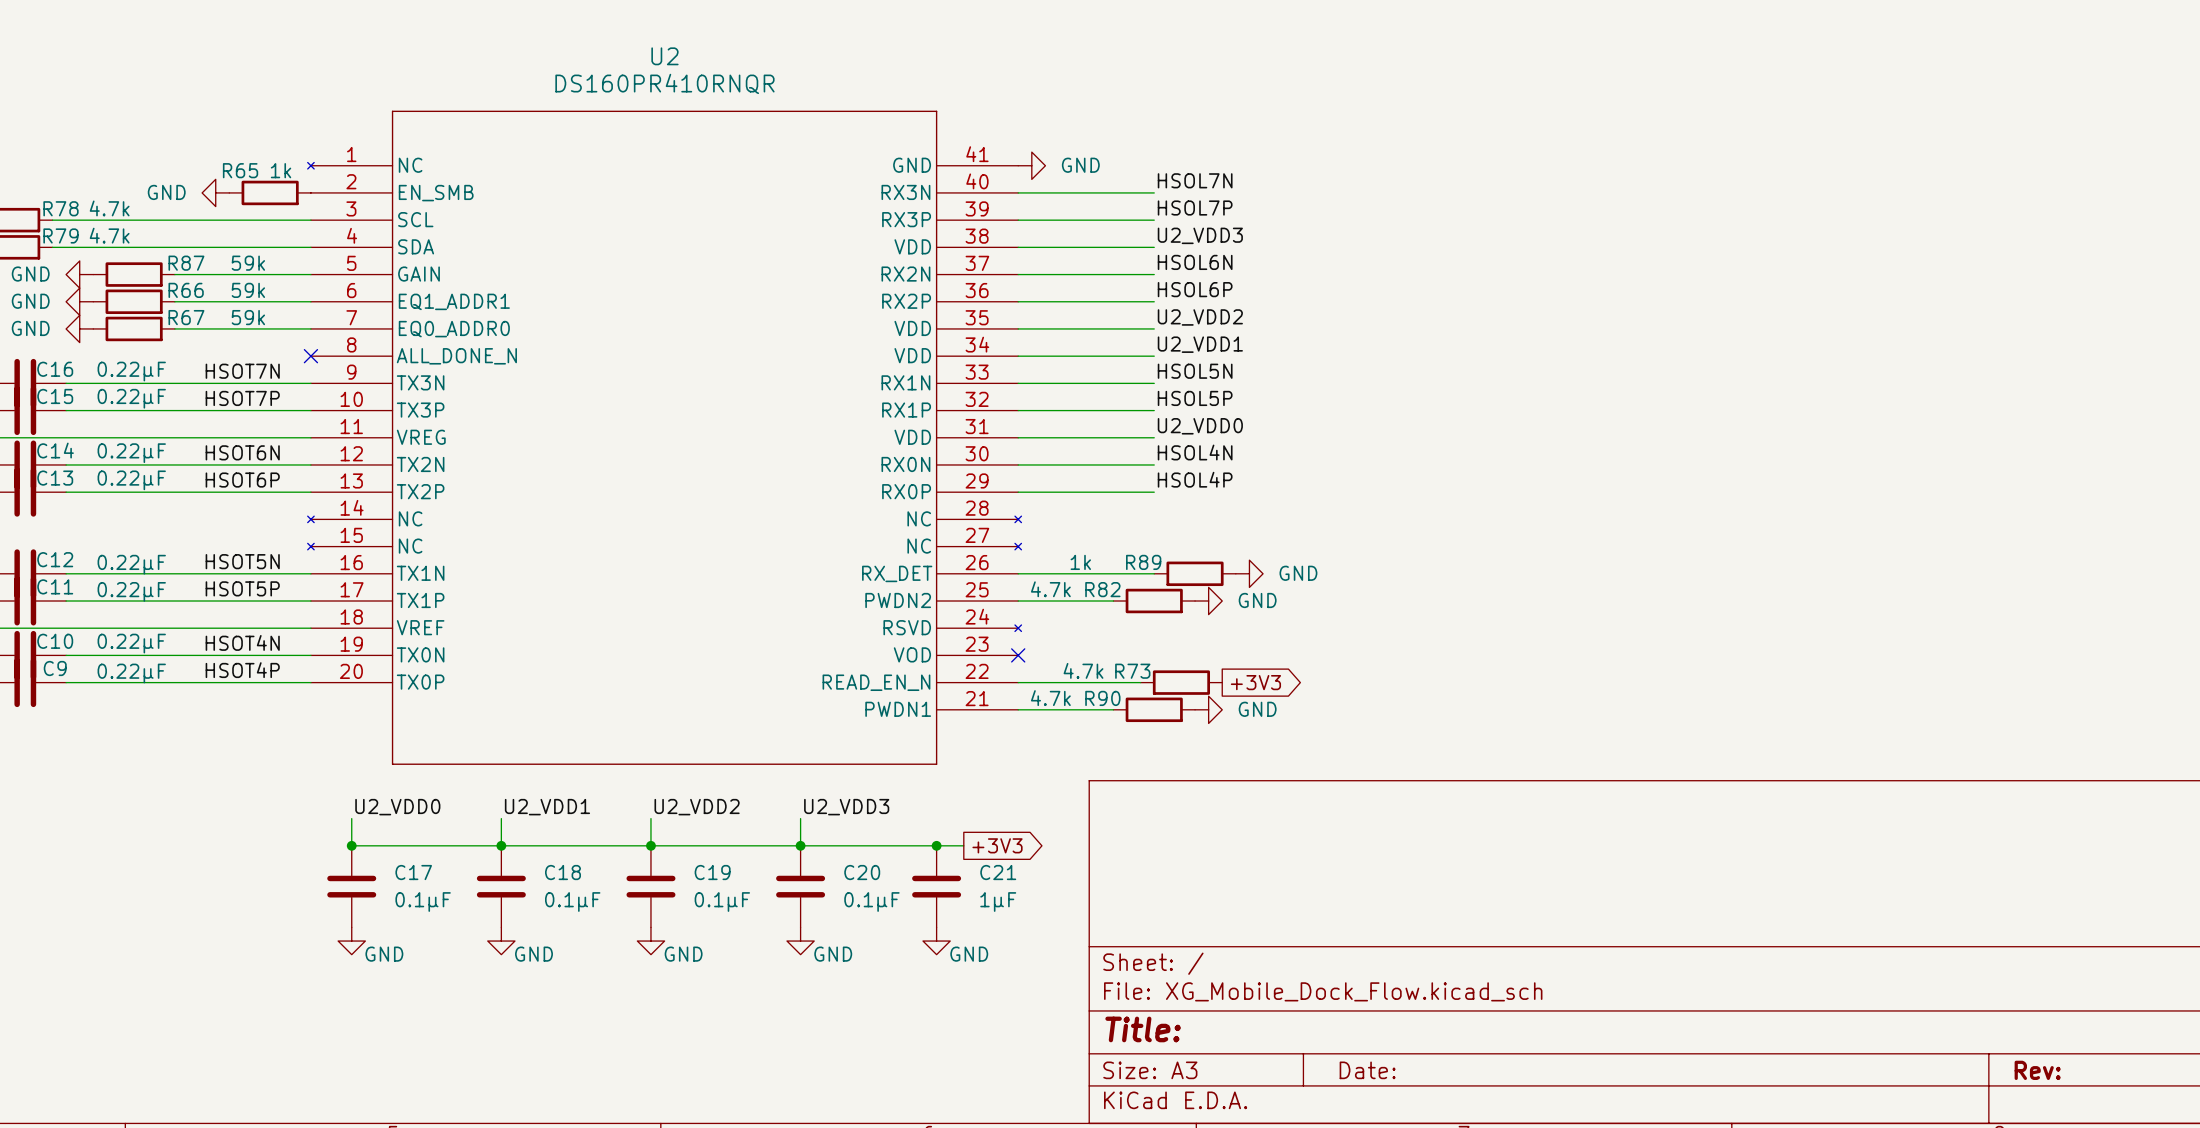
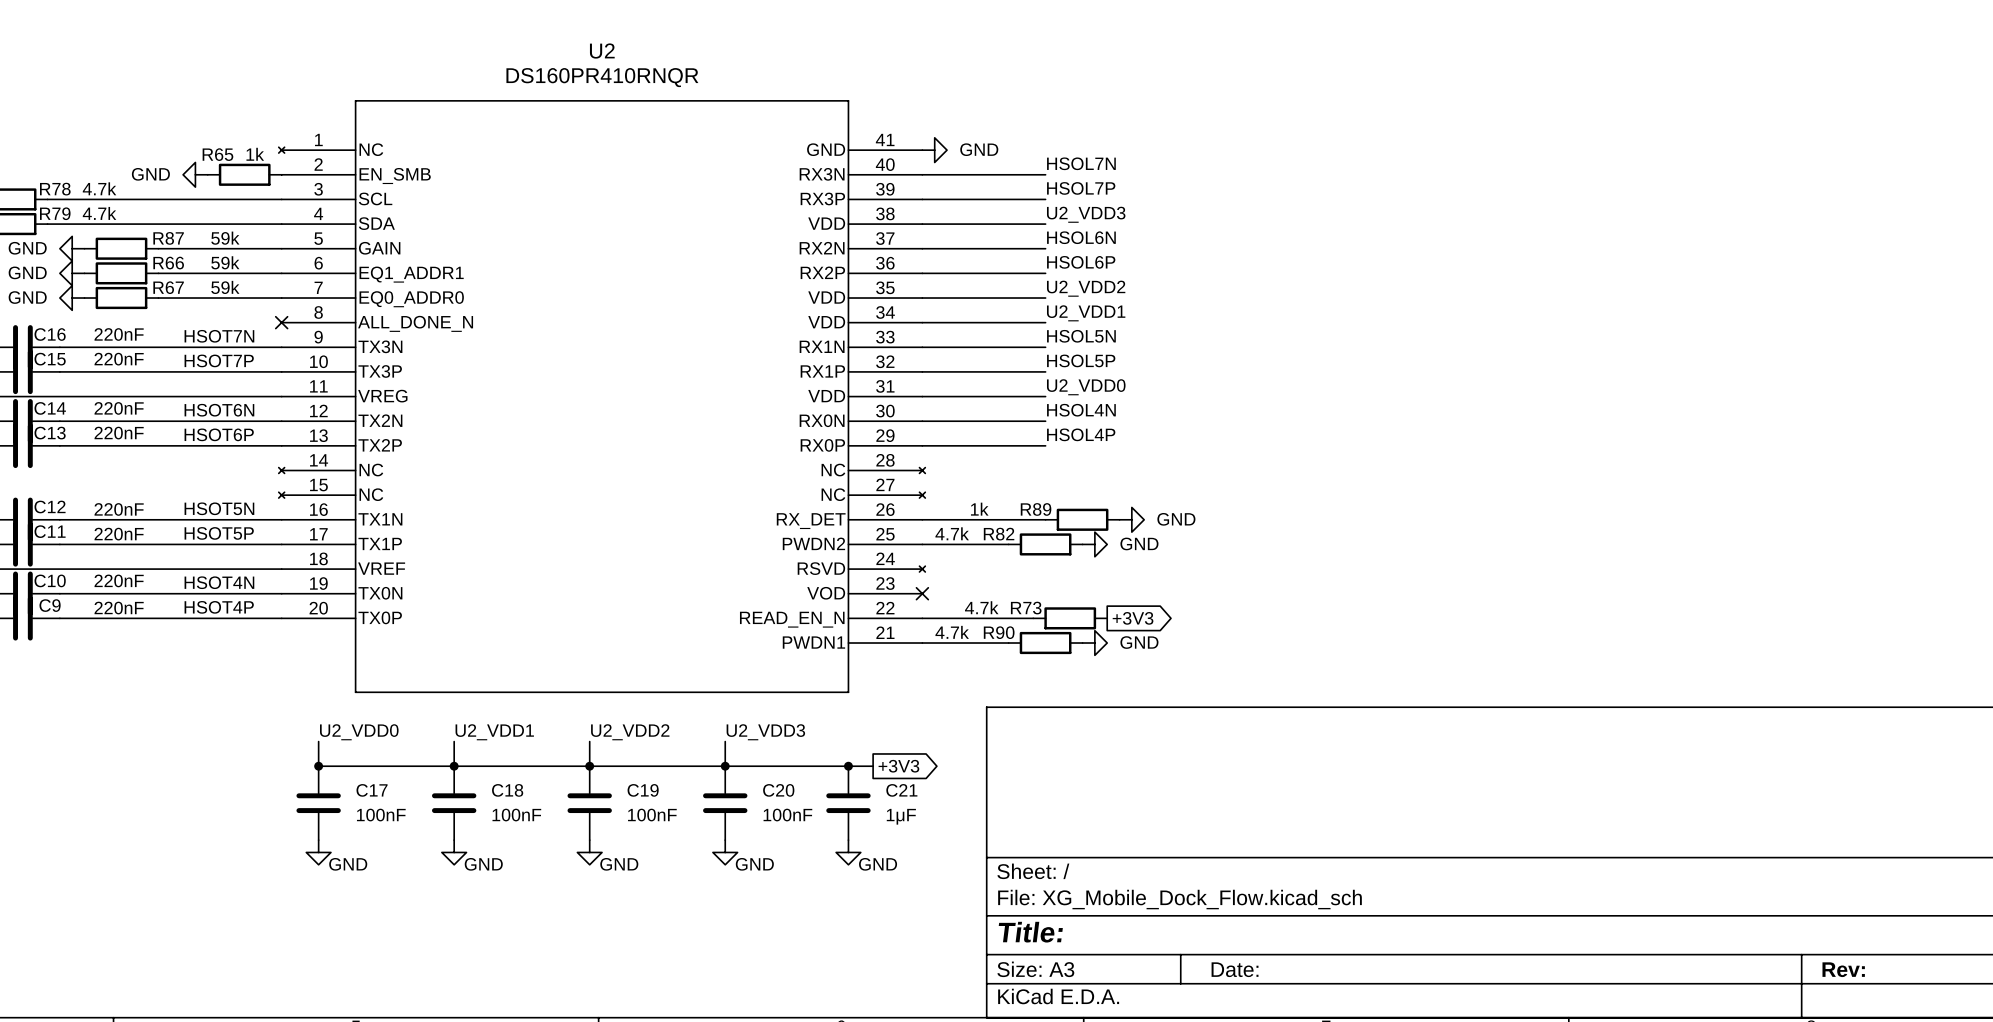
C16 value: 0.22μF (131, 371) -> 220nF (119, 334)
C15 value: 0.22μF (131, 398) -> 220nF (119, 359)
C14 value: 0.22μF (131, 453) -> 220nF (119, 408)
C13 value: 0.22μF (131, 480) -> 220nF (119, 433)
C12 value: 0.22μF (131, 564) -> 220nF (119, 509)
C11 value: 0.22μF (131, 591) -> 220nF (119, 534)
C10 value: 0.22μF (131, 643) -> 220nF (119, 580)
C9 value: 0.22μF (131, 673) -> 220nF (119, 608)
C17 value: 0.1μF (423, 901) -> 100nF (381, 815)
C18 value: 0.1μF (572, 901) -> 100nF (516, 815)
C19 value: 0.1μF (722, 901) -> 100nF (652, 815)
C20 value: 0.1μF (871, 901) -> 100nF (787, 815)

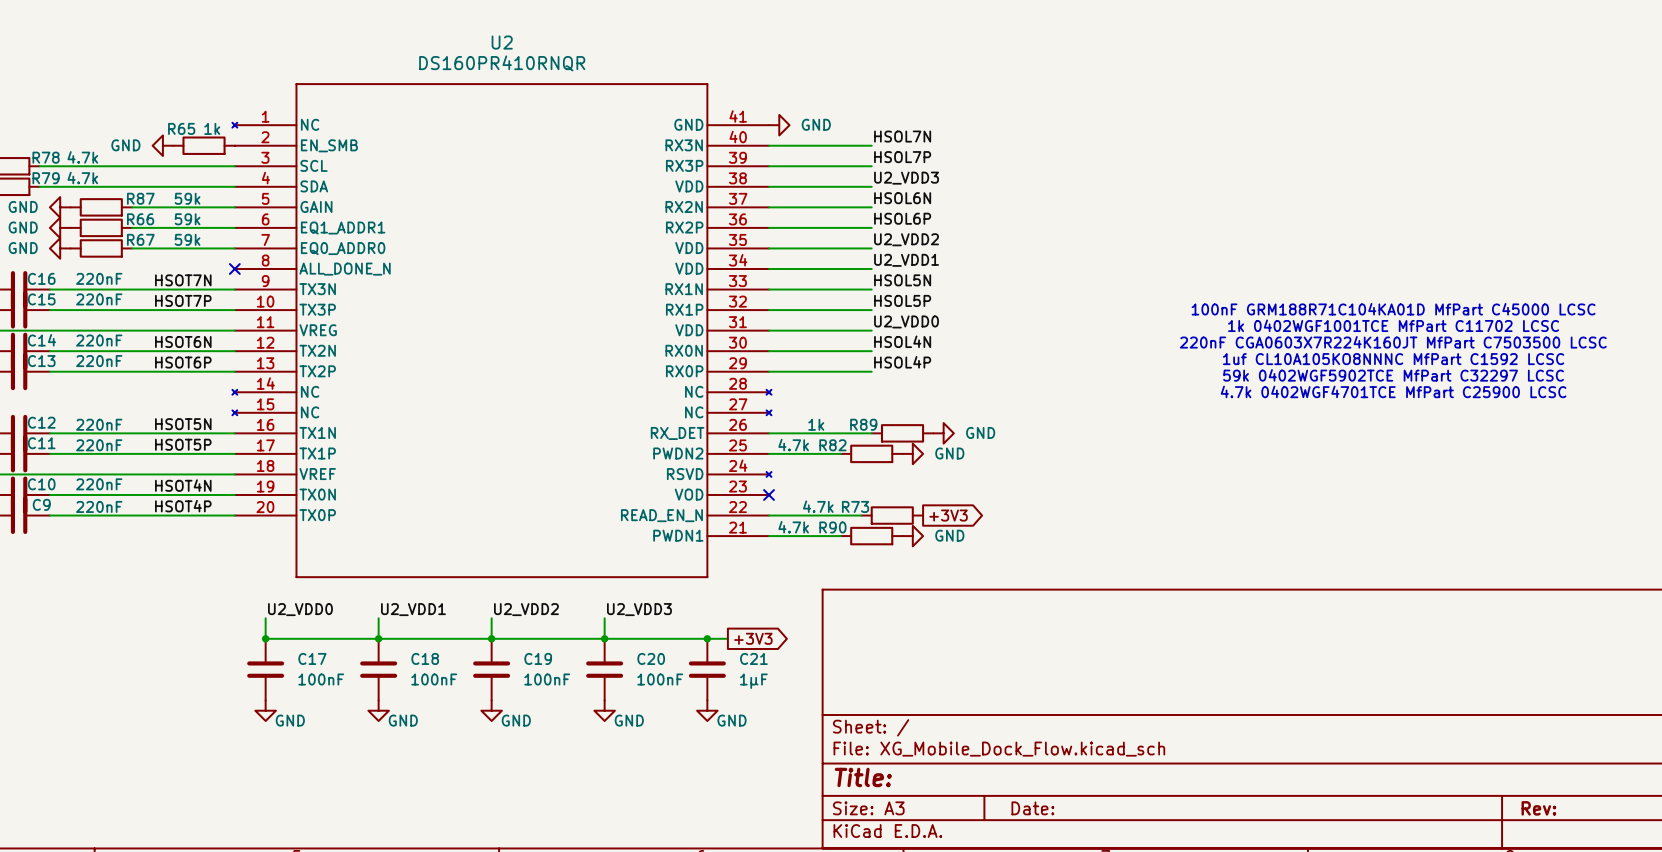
text: none -> 100nF GRM188R71C104KA01D MfPart C45000 LCSC (1393, 309)
text: none -> 1k 0402WGF1001TCE MfPart C11702 LCSC (1393, 325)
text: none -> 220nF CGA0603X7R224K160JT MfPart C7503500 LCSC (1393, 342)
text: none -> 1uf CL10A105KO8NNNC MfPart C1592 LCSC (1393, 359)
text: none -> 59k 0402WGF5902TCE MfPart C32297 LCSC (1393, 375)
text: none -> 4.7k 0402WGF4701TCE MfPart C25900 LCSC (1393, 391)

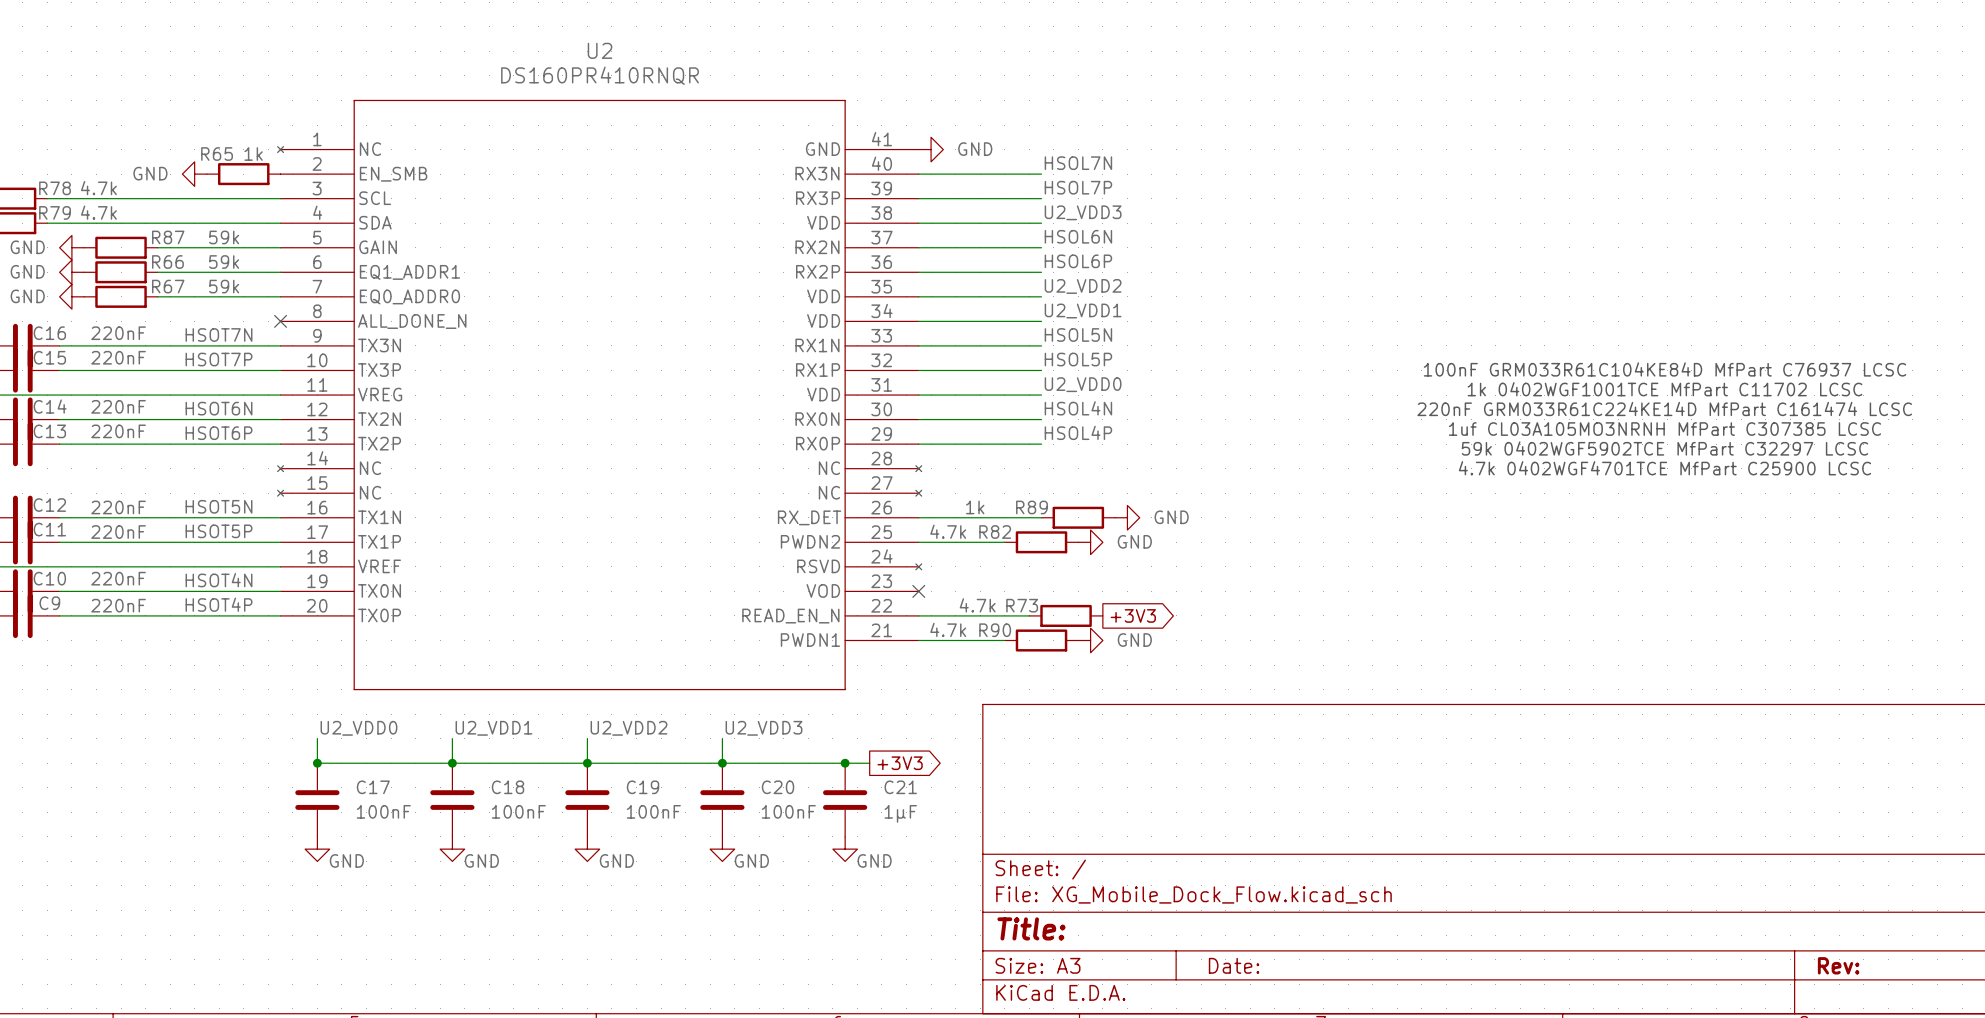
text: 100nF GRM188R71C104KA01D MfPart C45000 LCSC (1393, 309) -> 100nF GRM033R61C104KE84D MfPart C76937 LCSC (1664, 369)
text: 220nF CGA0603X7R224K160JT MfPart C7503500 LCSC (1393, 342) -> 220nF GRM033R61C224KE14D MfPart C161474 LCSC (1664, 408)
text: 1uf CL10A105KO8NNNC MfPart C1592 LCSC (1393, 359) -> 1uf CL03A105MO3NRNH MfPart C307385 LCSC (1664, 429)

